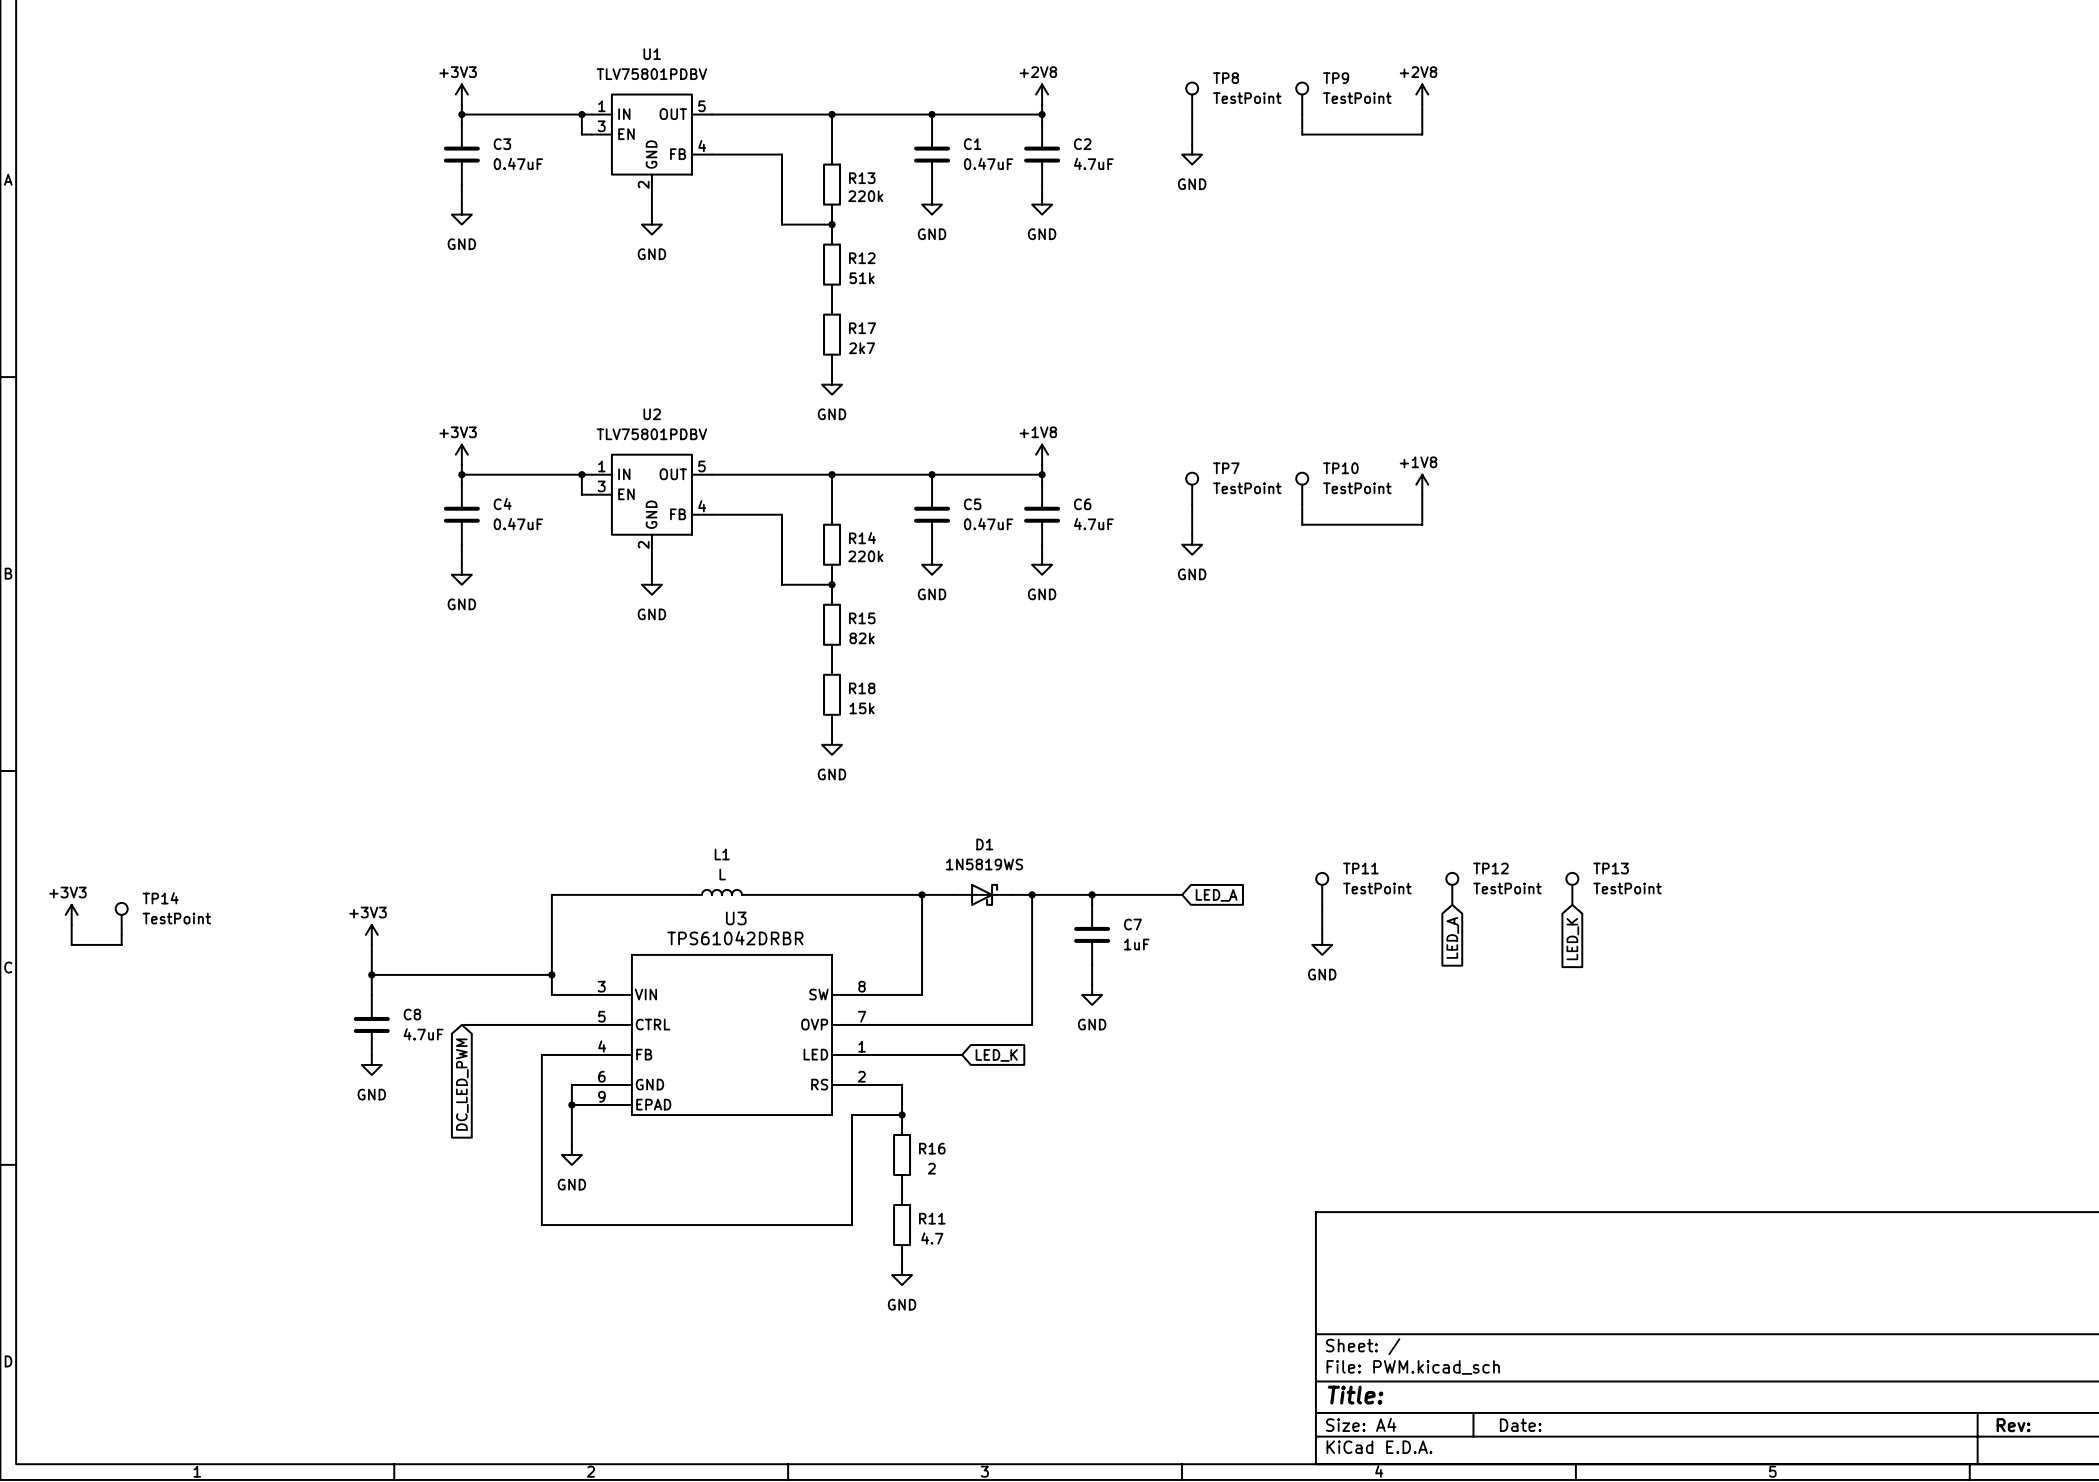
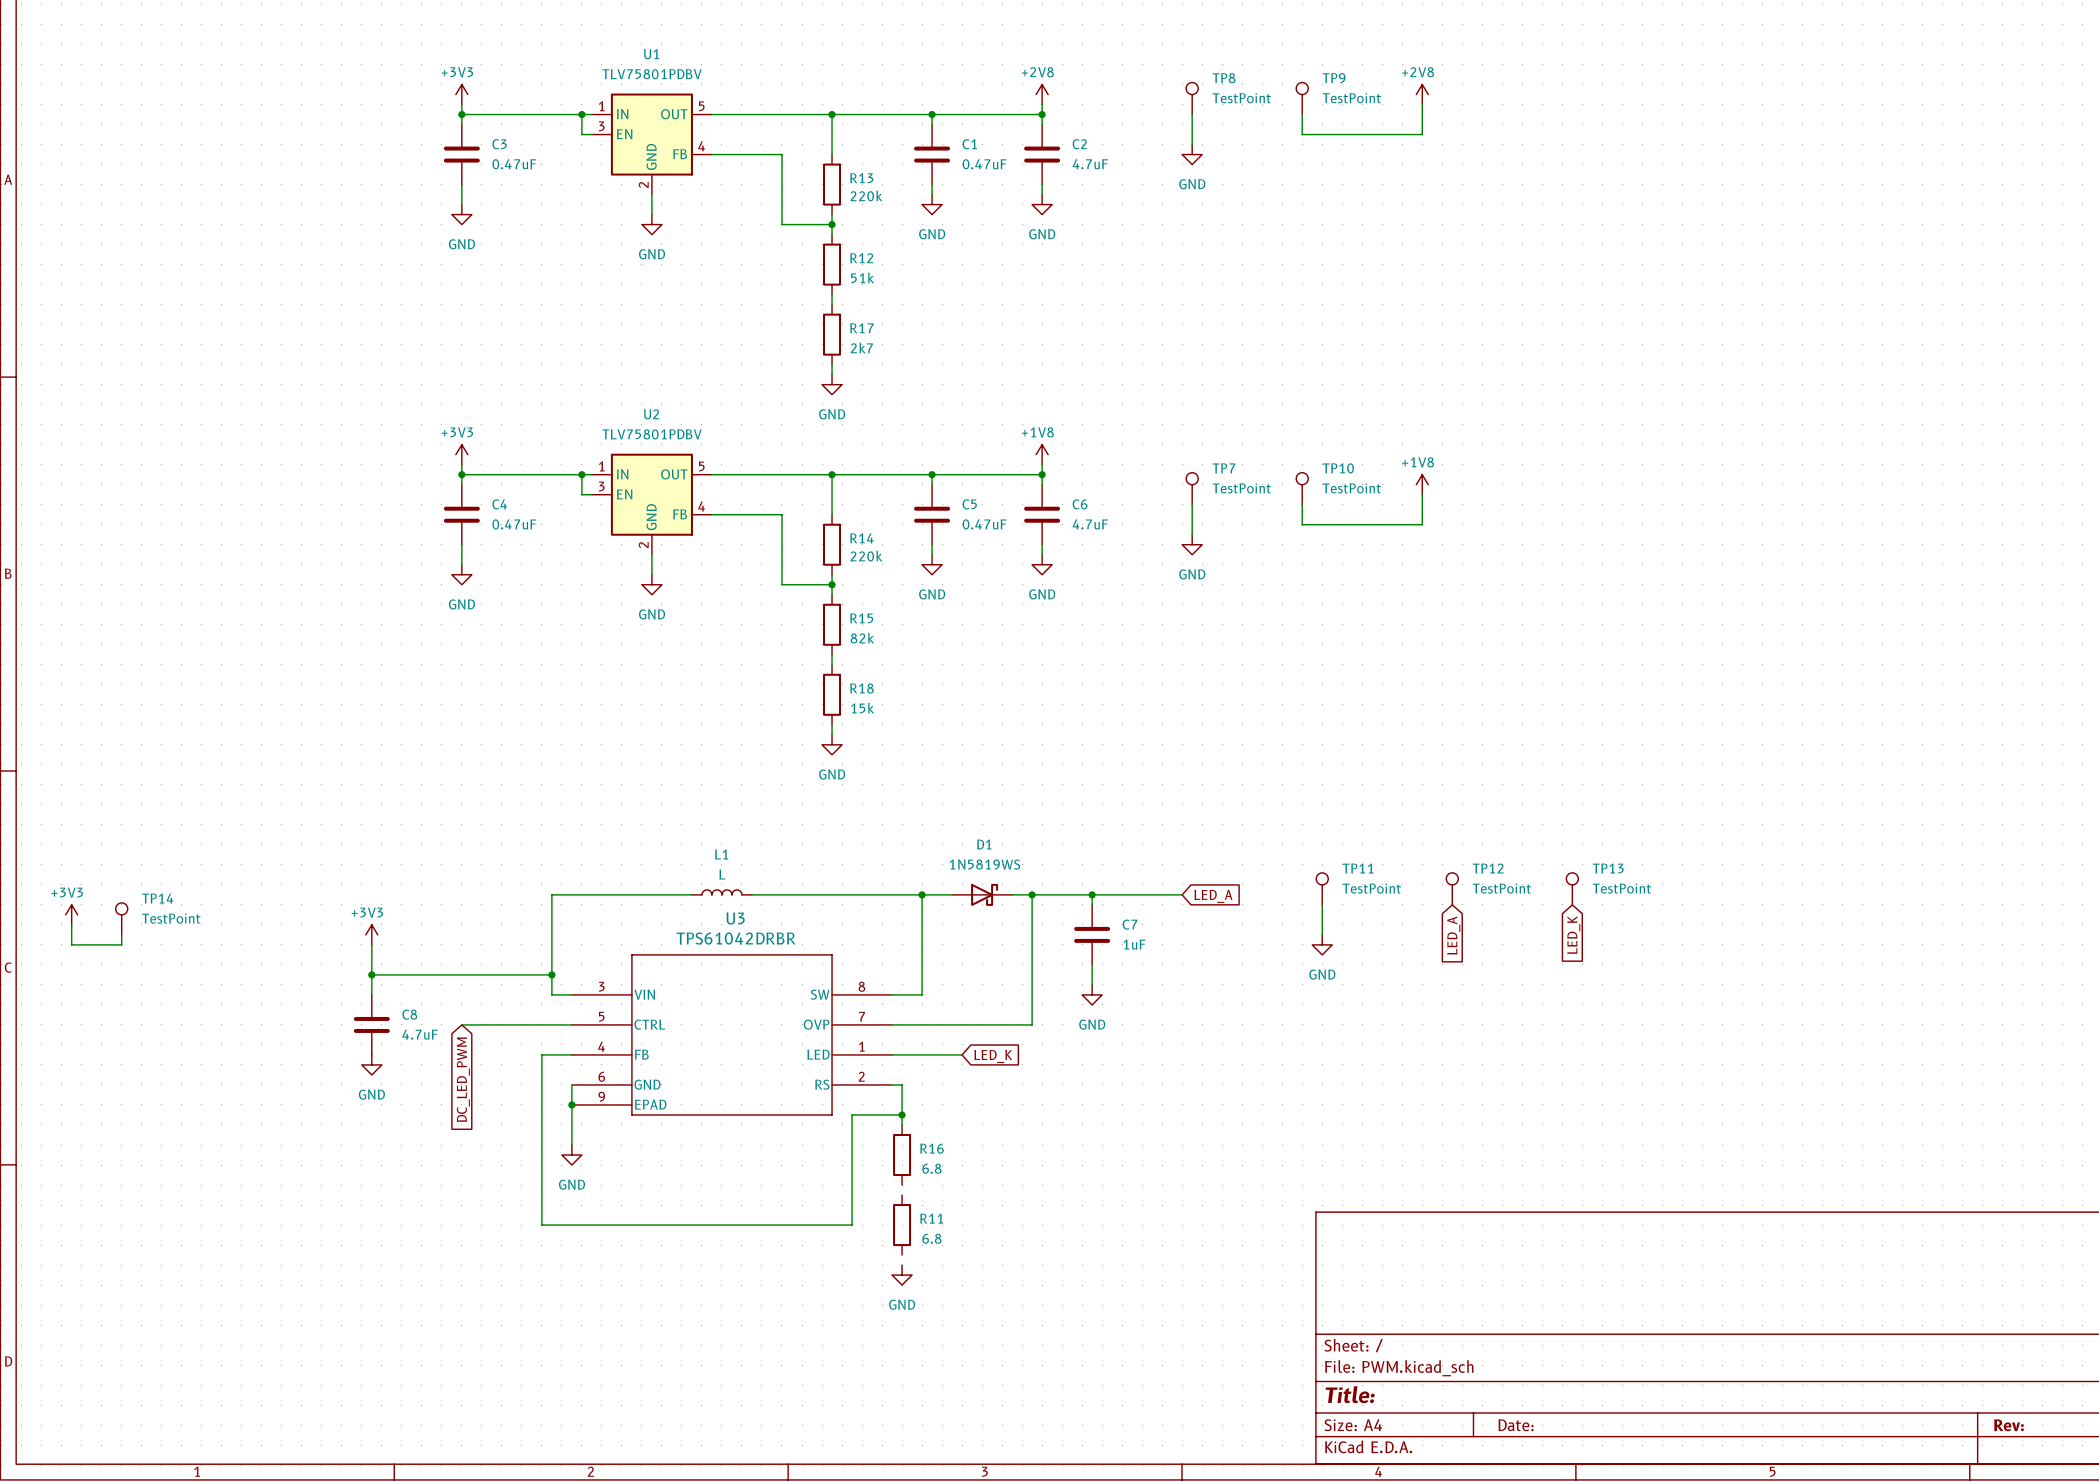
R16 value: 2 (931, 1168) -> 6.8 (931, 1168)
wire: (902, 1185) (902, 1195) -> none
R11 value: 4.7 (932, 1238) -> 6.8 (931, 1238)
wire: (902, 1255) (902, 1265) -> none

